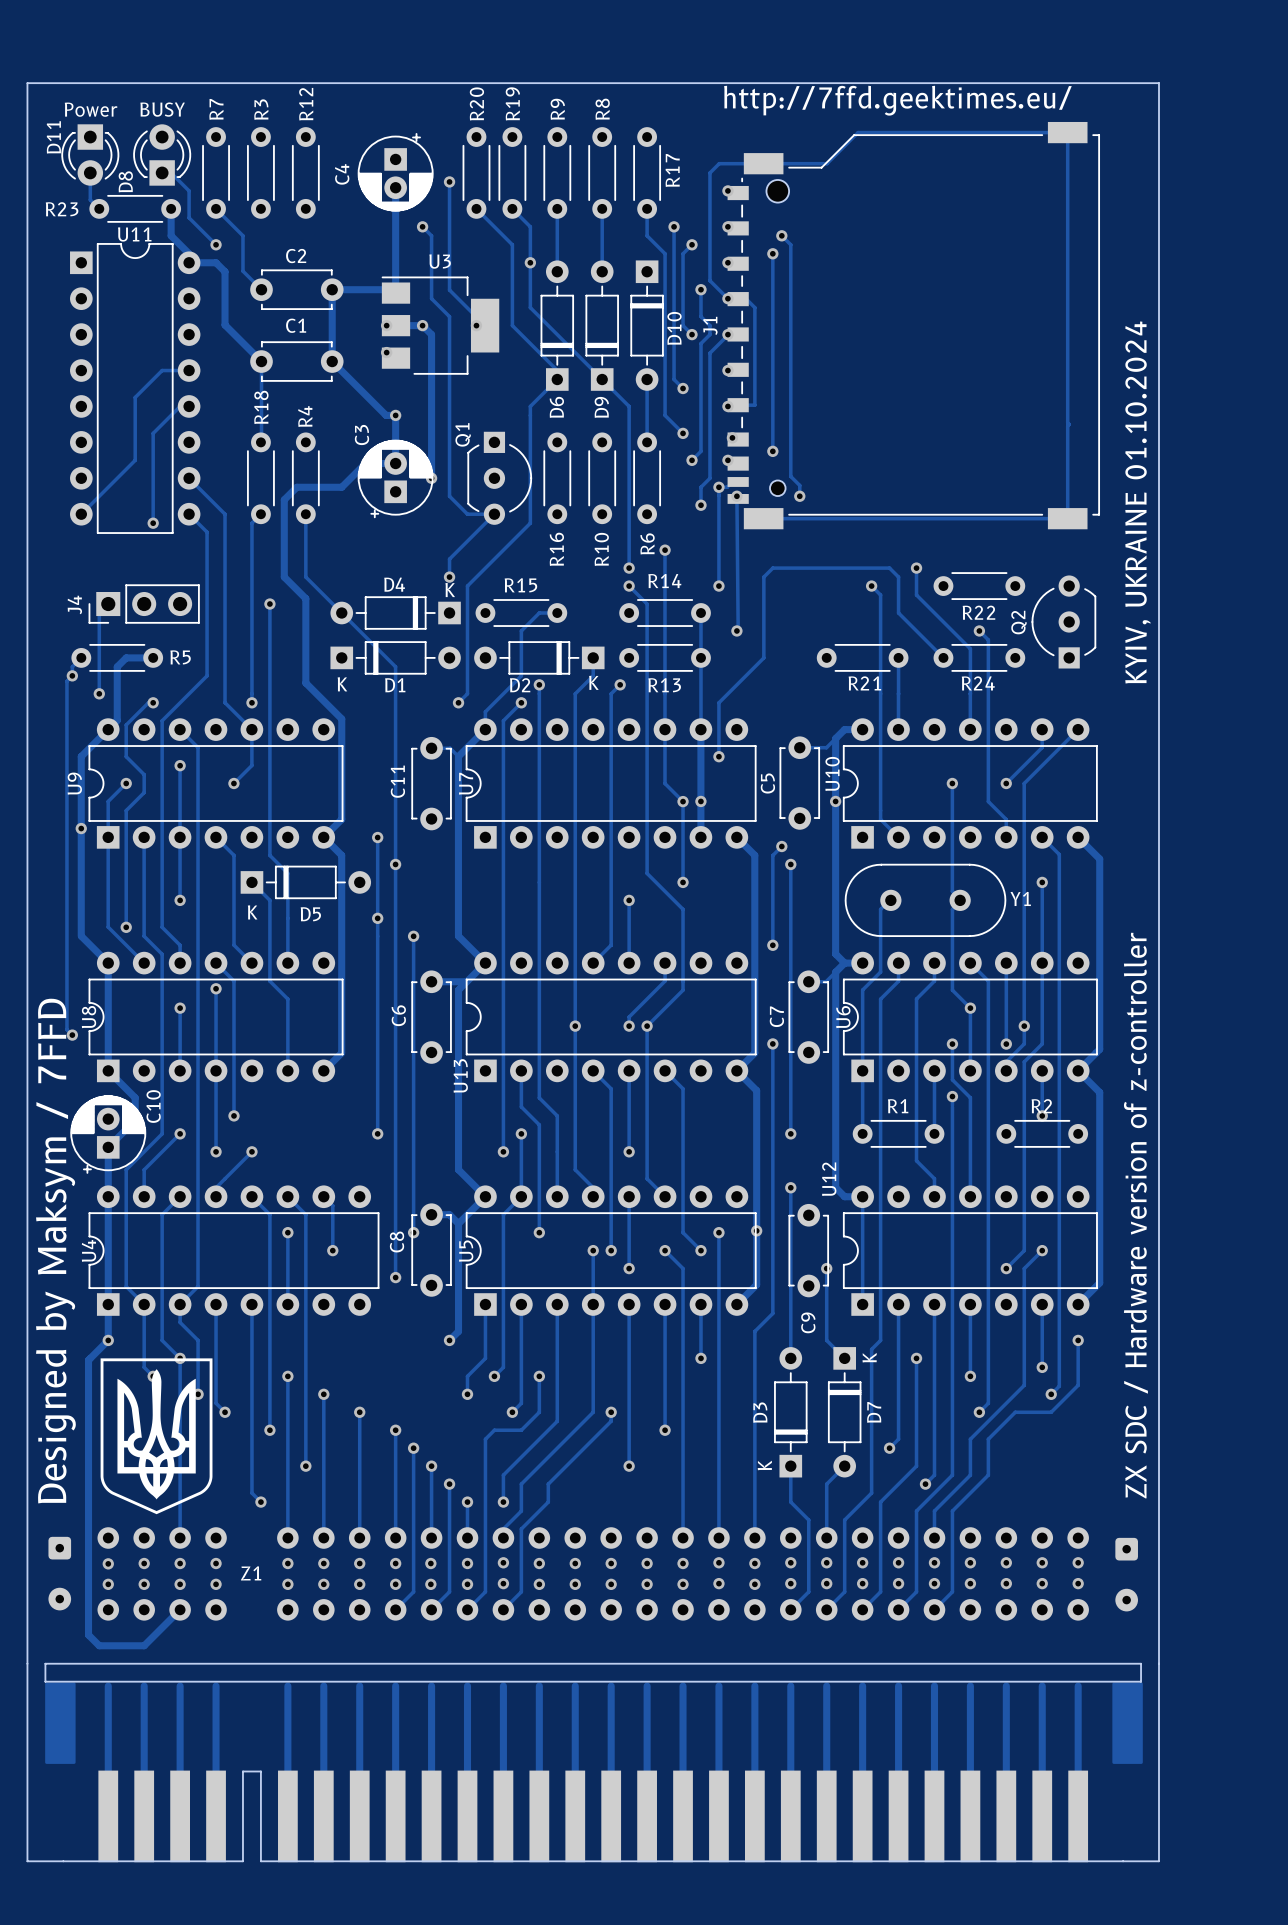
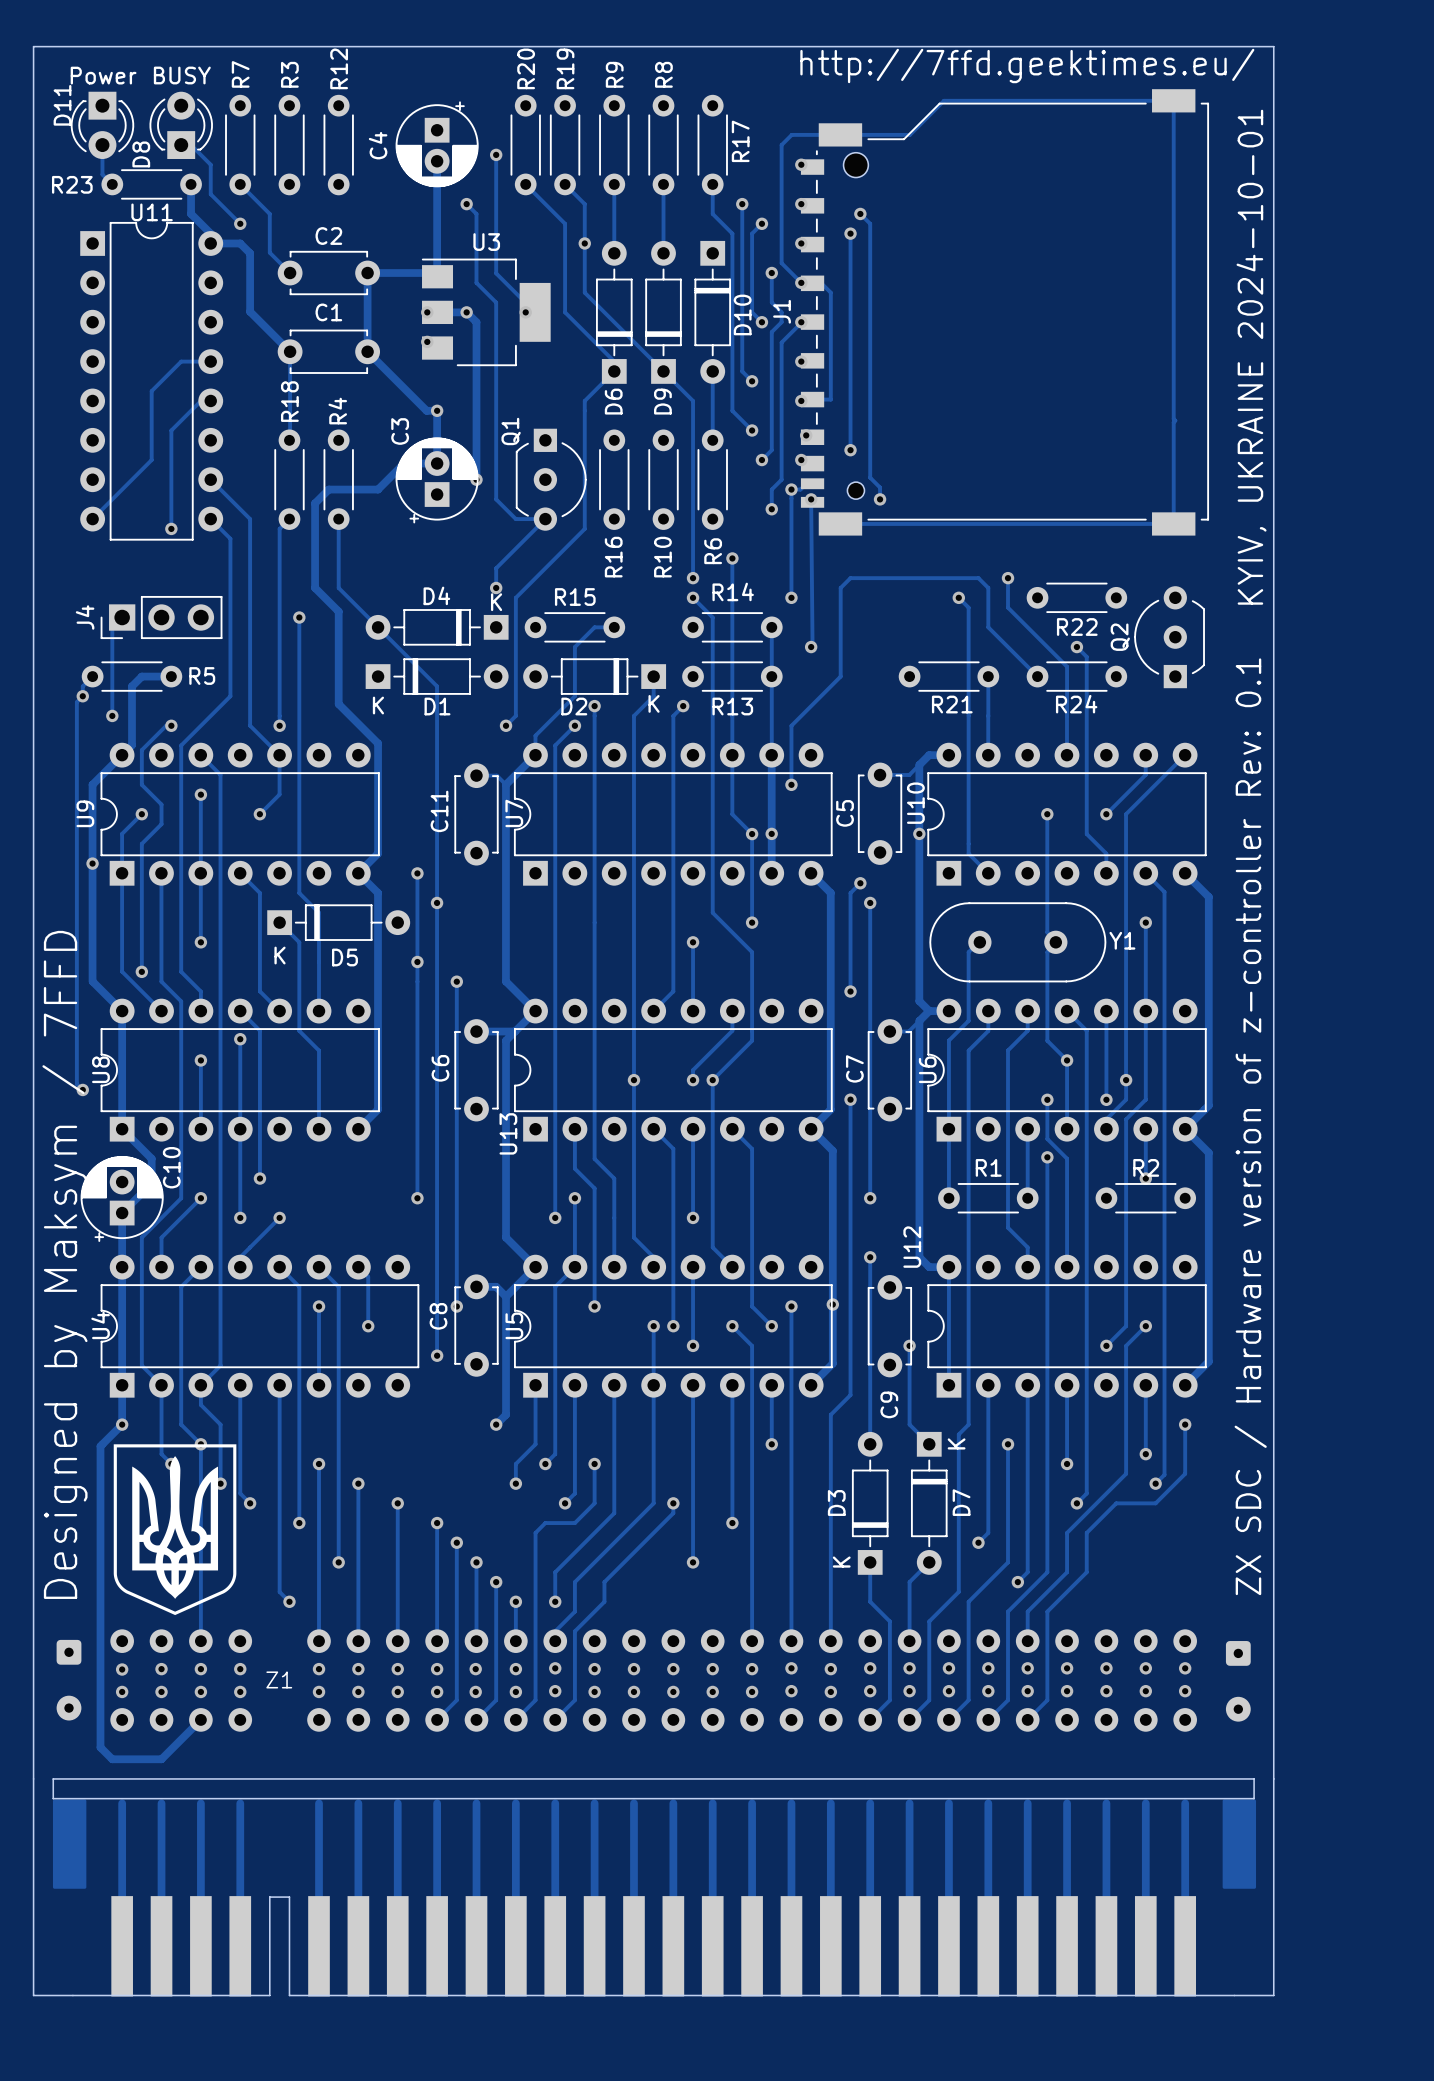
text: KYIV, UKRAINE 01.10.2024 (1138, 502) -> KYIV, UKRAINE 2024-10-01 (1251, 357)
text: ZX SDC / Hardware version of z-controller (1135, 1215) -> ZX SDC / Hardware version of z-controller Rev: 0.1 (1250, 1126)

